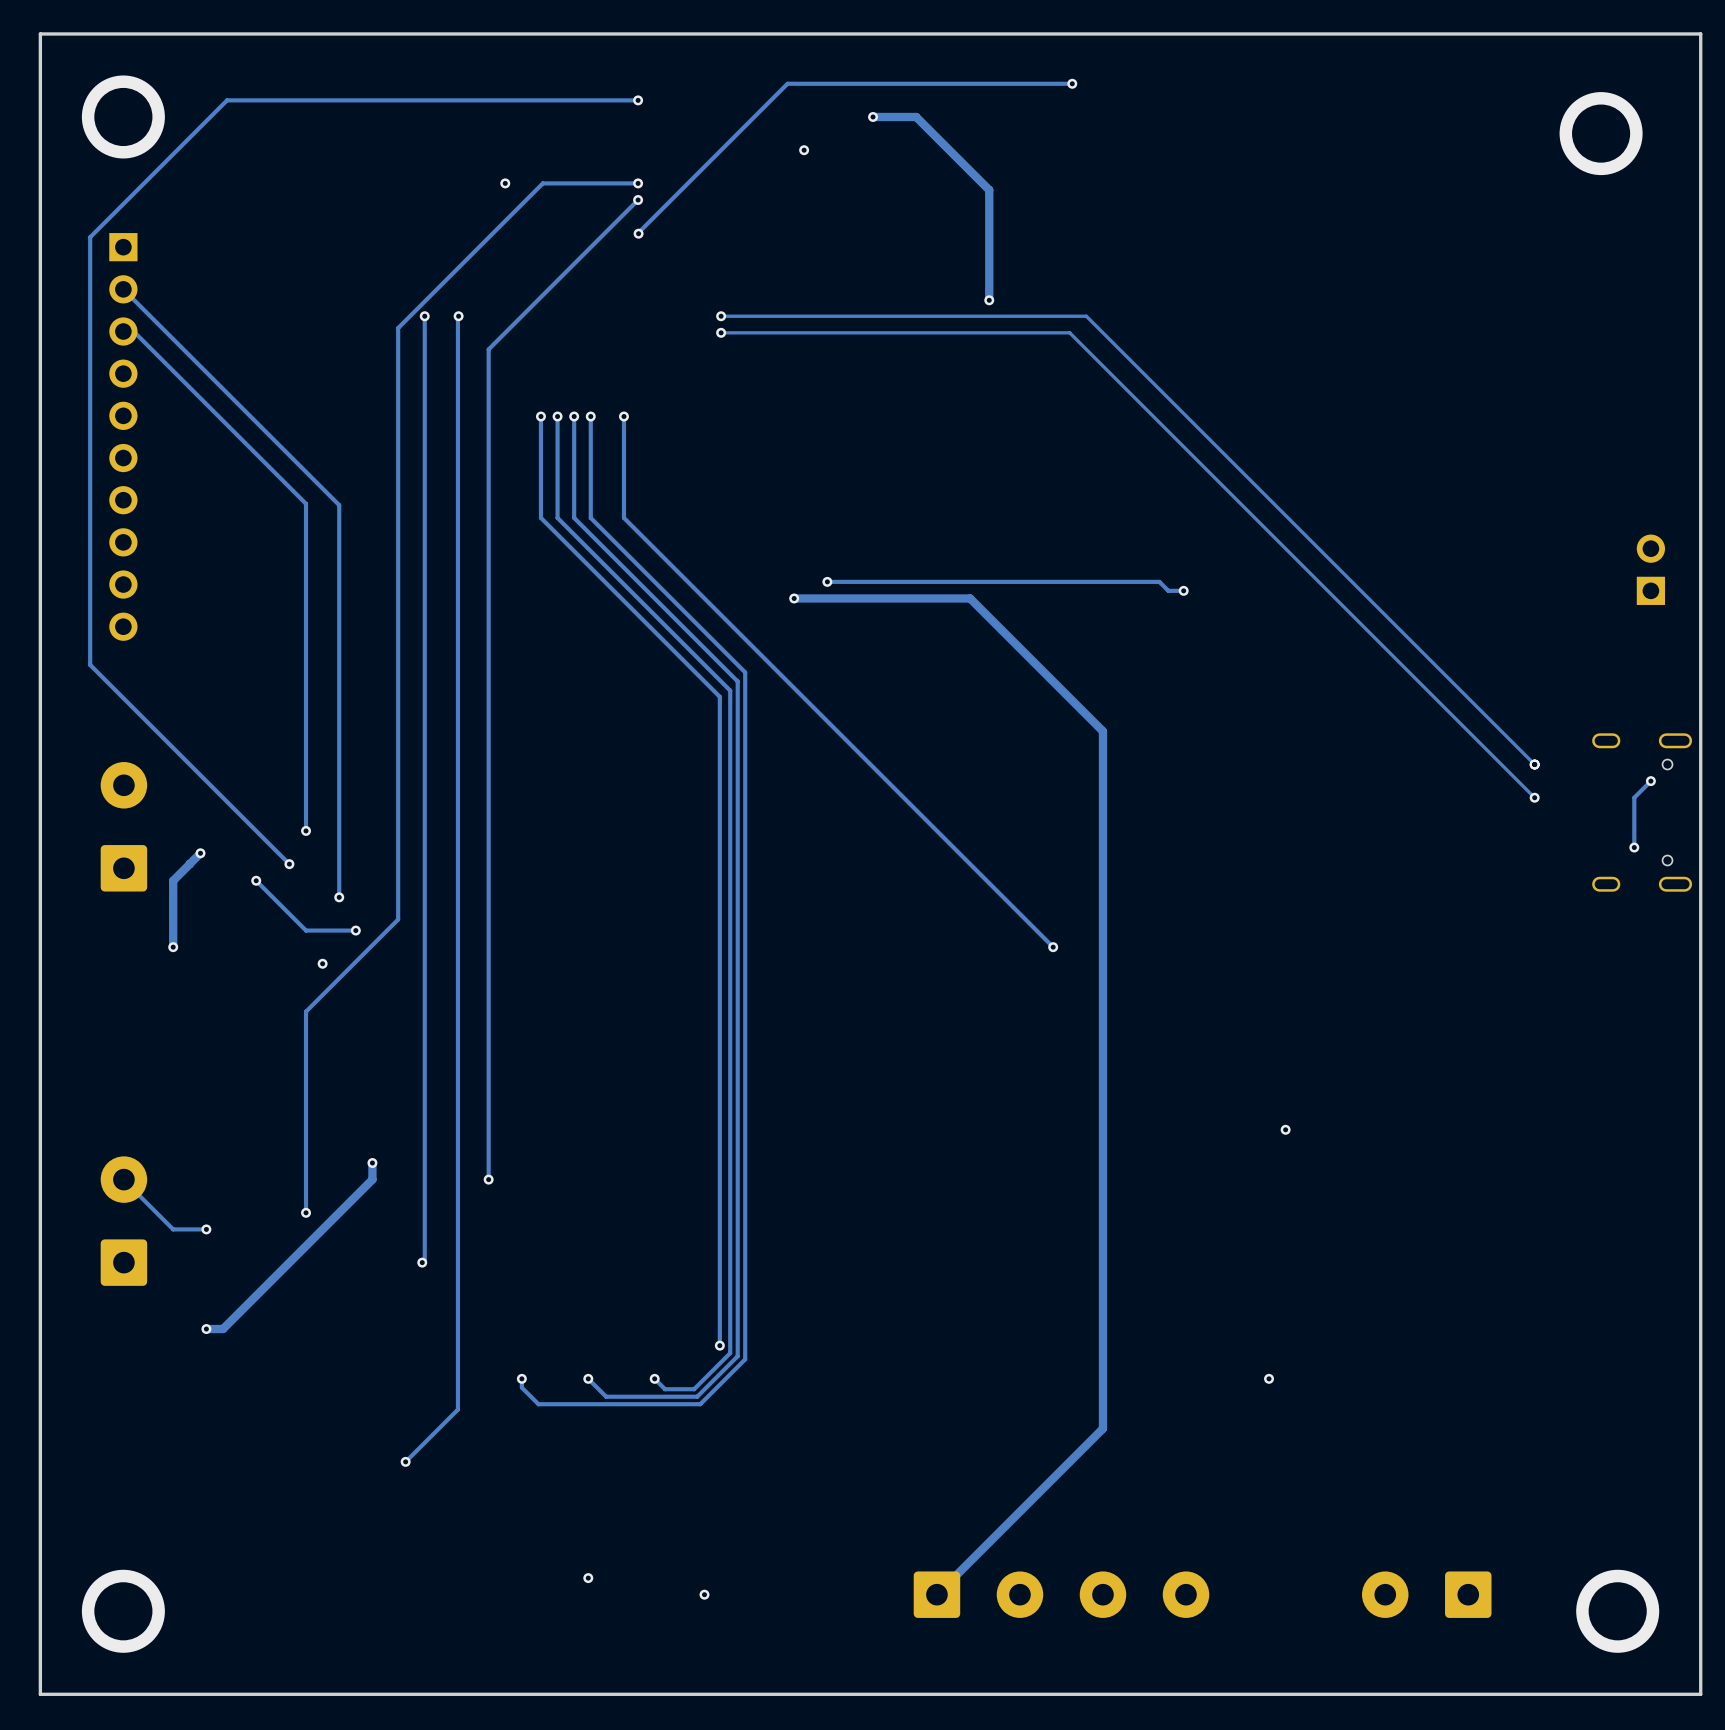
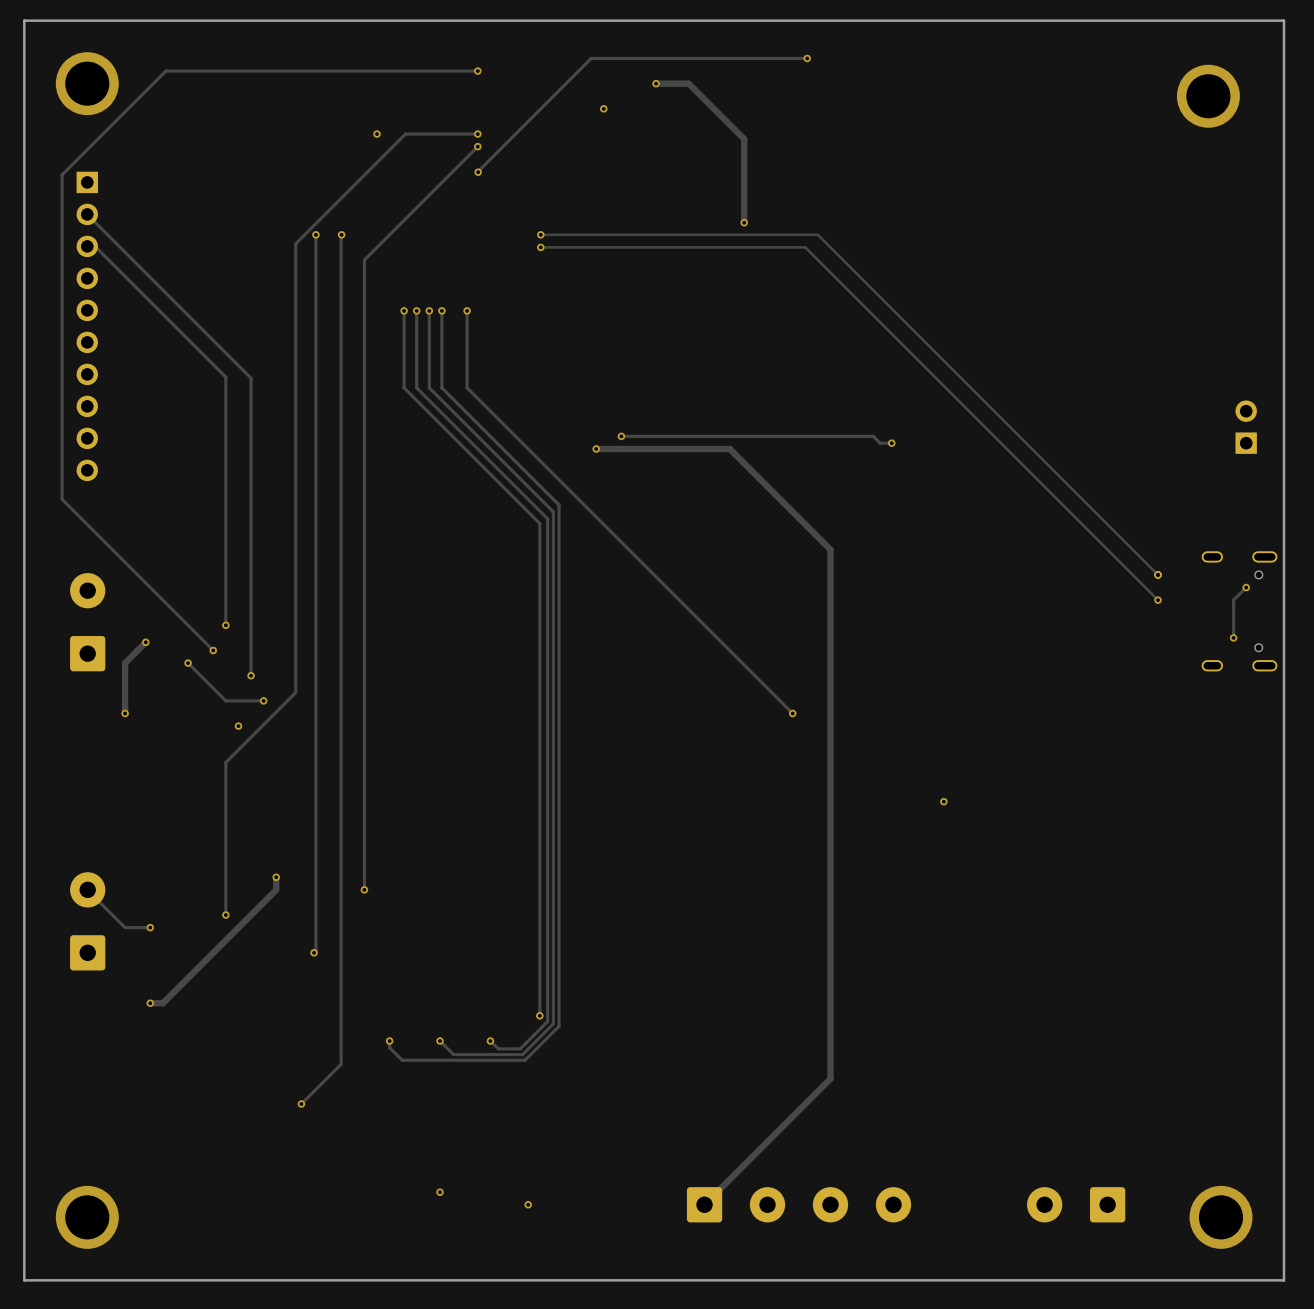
via position: (1285, 1129) -> (943, 801)
via: (1269, 1378) -> none

